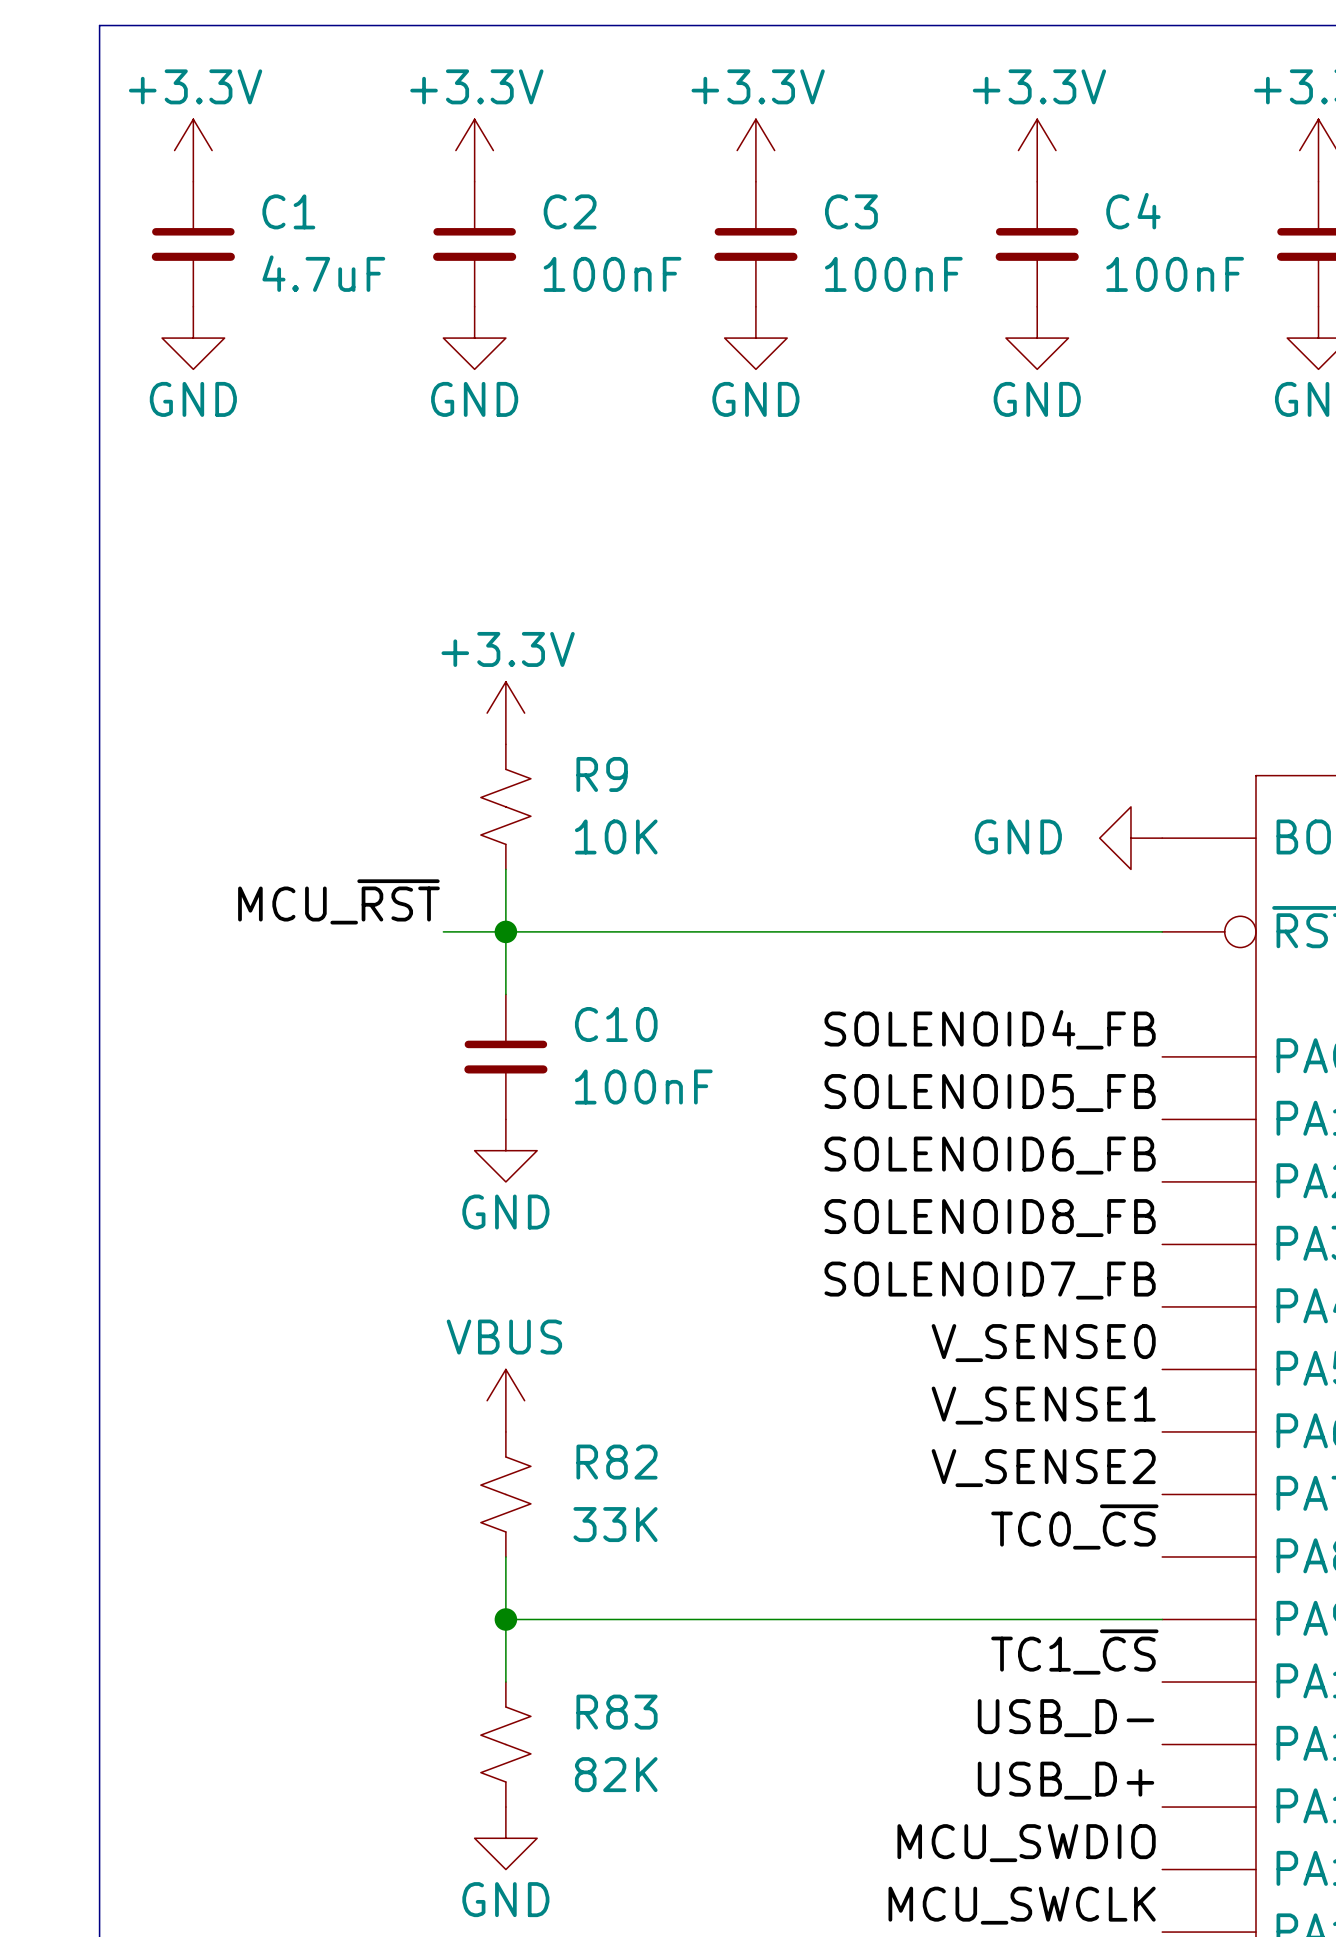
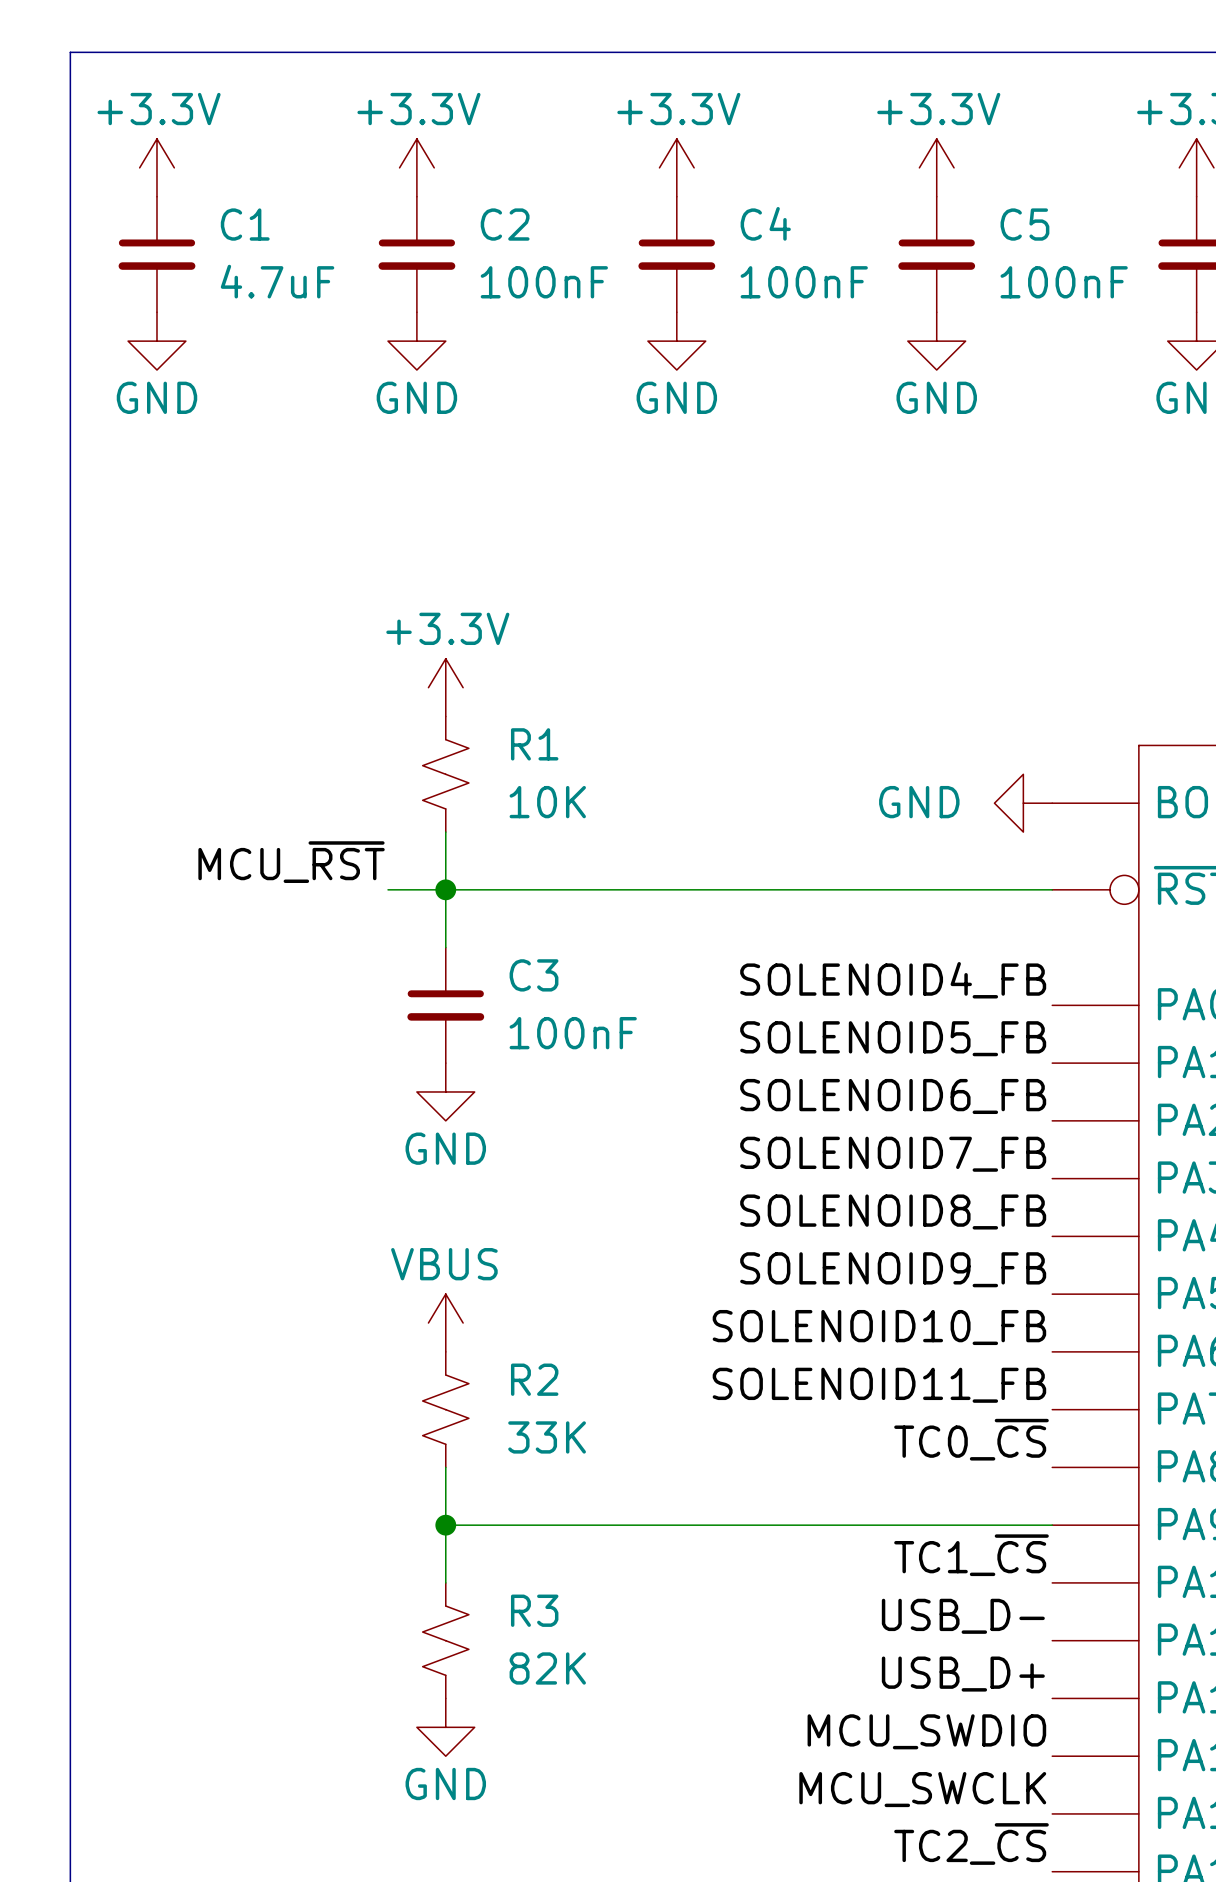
C3 name: C3 (851, 211) -> C4 (765, 223)
C4 name: C4 (1133, 211) -> C5 (1024, 224)
R9 name: R9 (602, 774) -> R1 (534, 744)
C10 name: C10 (616, 1024) -> C3 (534, 975)
label: SOLENOID8_FB (990, 1218) -> SOLENOID7_FB (893, 1154)
label: SOLENOID7_FB (990, 1280) -> SOLENOID8_FB (893, 1211)
label: V_SENSE0 (1043, 1343) -> SOLENOID9_FB (893, 1269)
label: V_SENSE1 (1043, 1405) -> SOLENOID10_FB (879, 1327)
R82 name: R82 (617, 1462) -> R2 (534, 1379)
label: V_SENSE2 (1043, 1468) -> SOLENOID11_FB (879, 1385)
R83 name: R83 (617, 1712) -> R3 (534, 1610)

